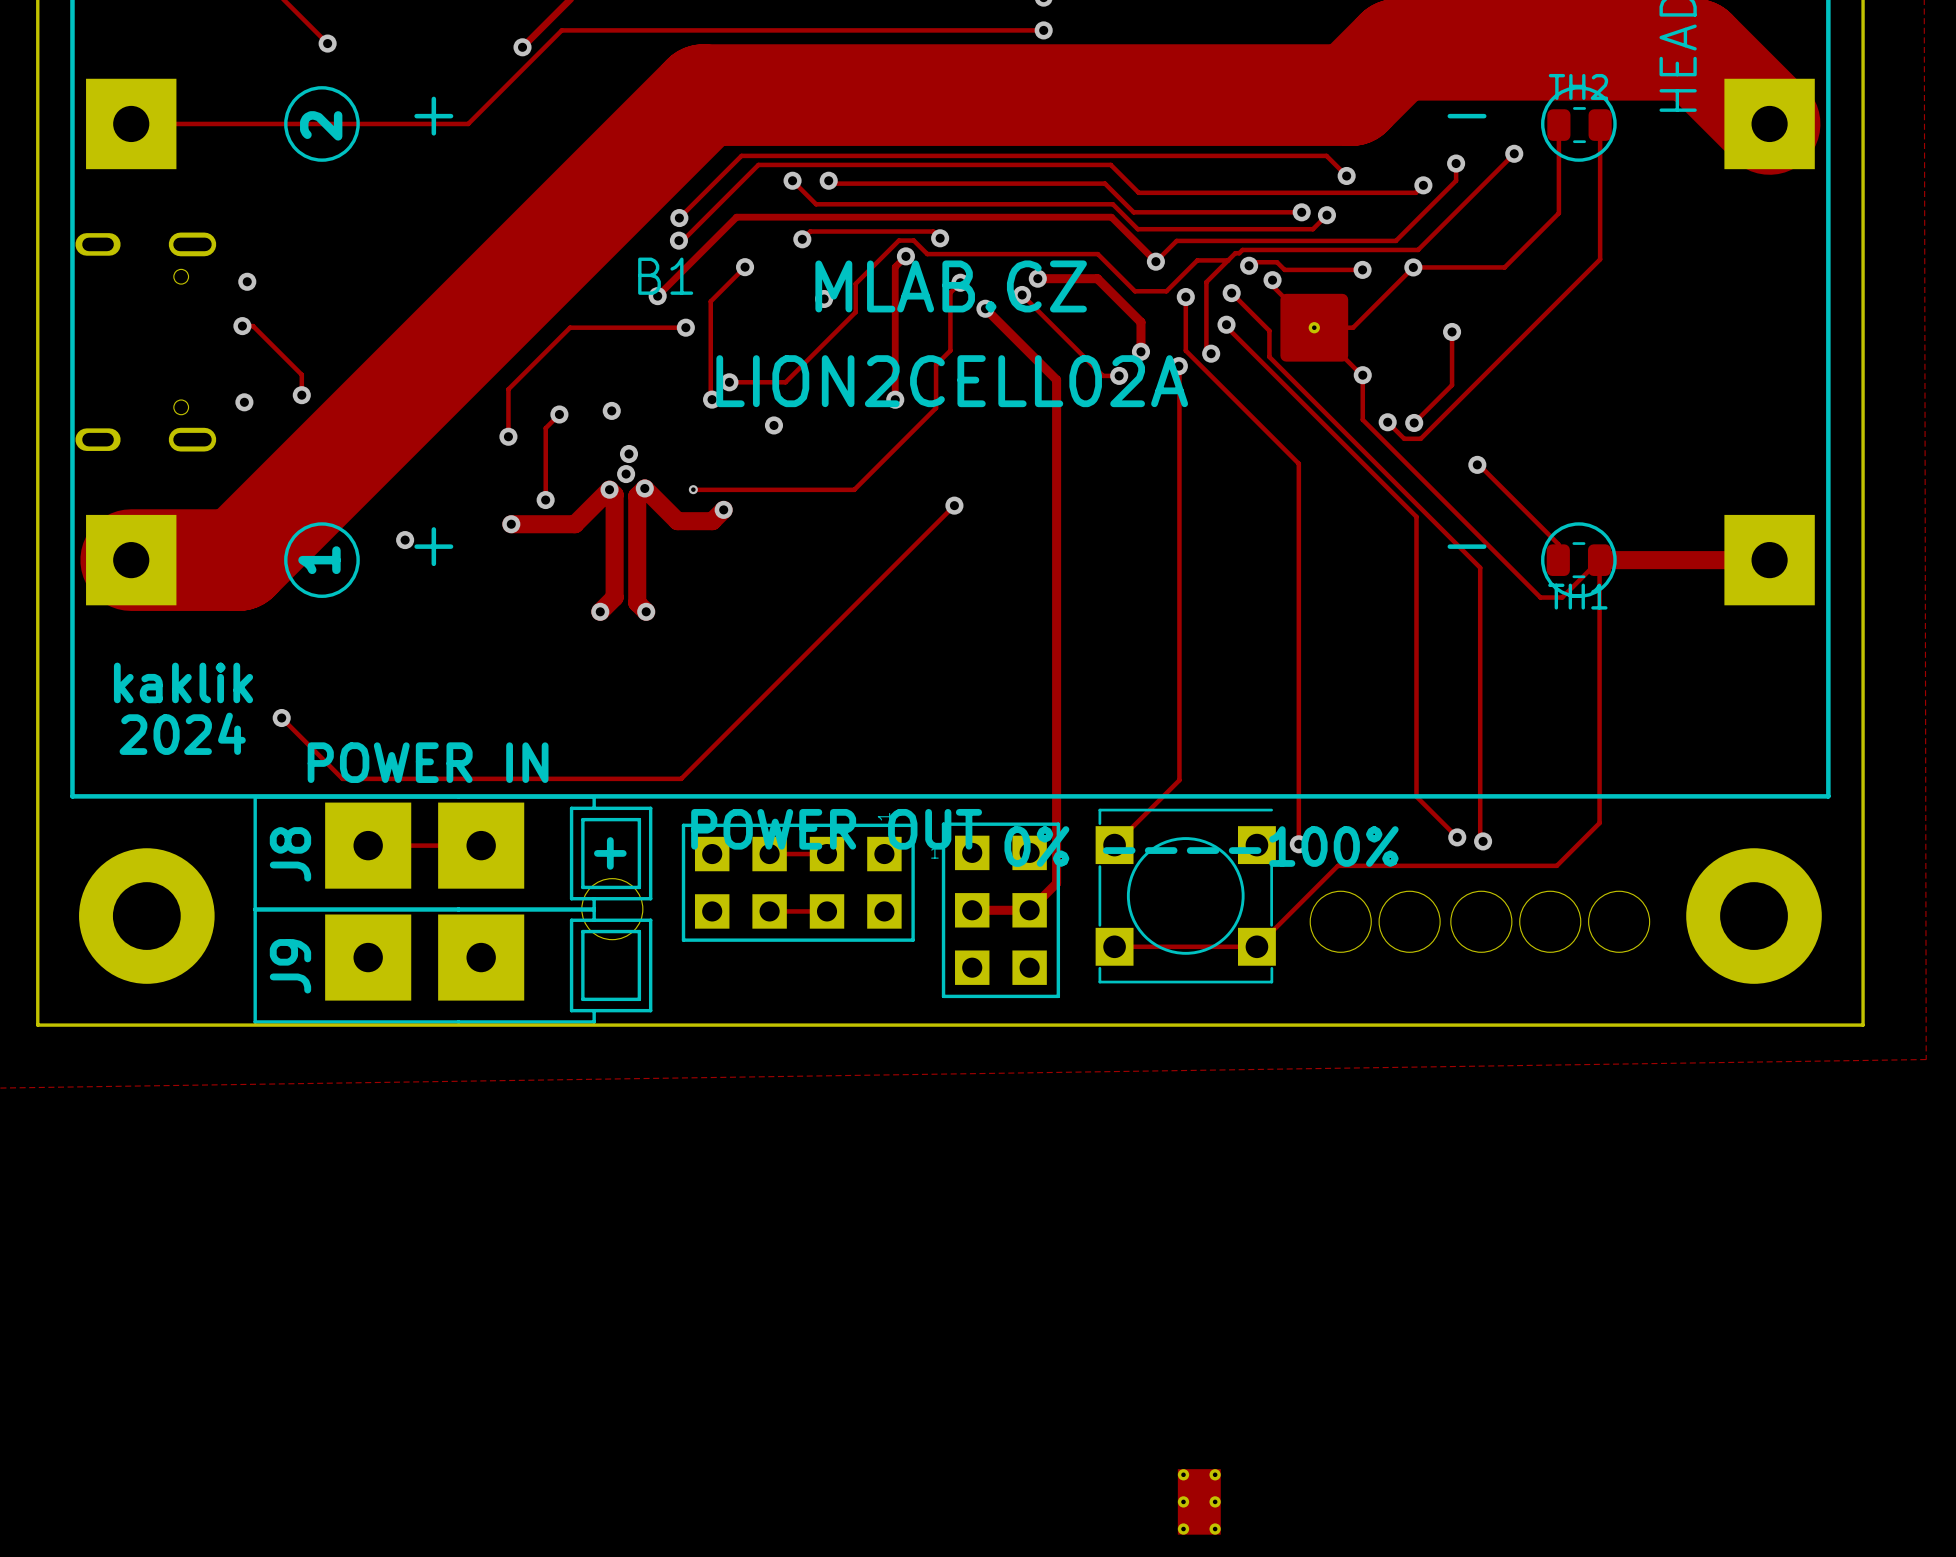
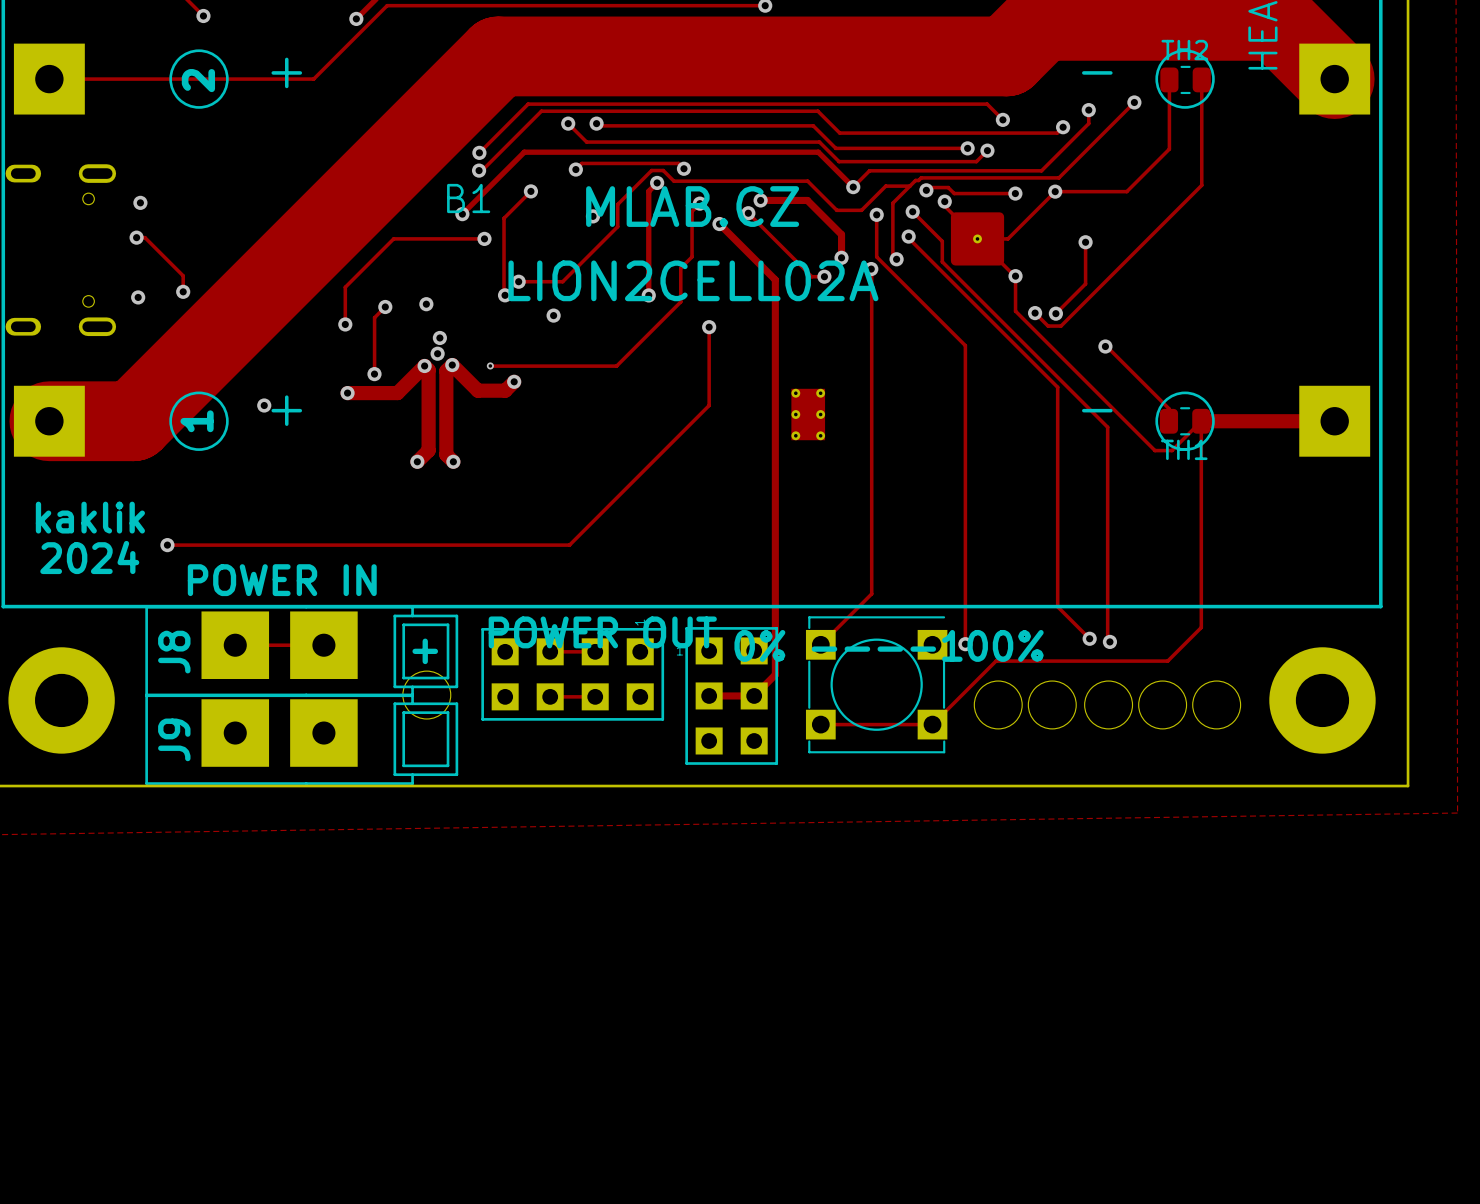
track: (954, 505) (681, 778) (342, 778) (281, 718) -> (709, 327) (709, 405) (569, 545) (167, 545)
via position: (954, 505) -> (709, 327)
part: none -> (808, 414)
part: (1199, 1501) -> none

